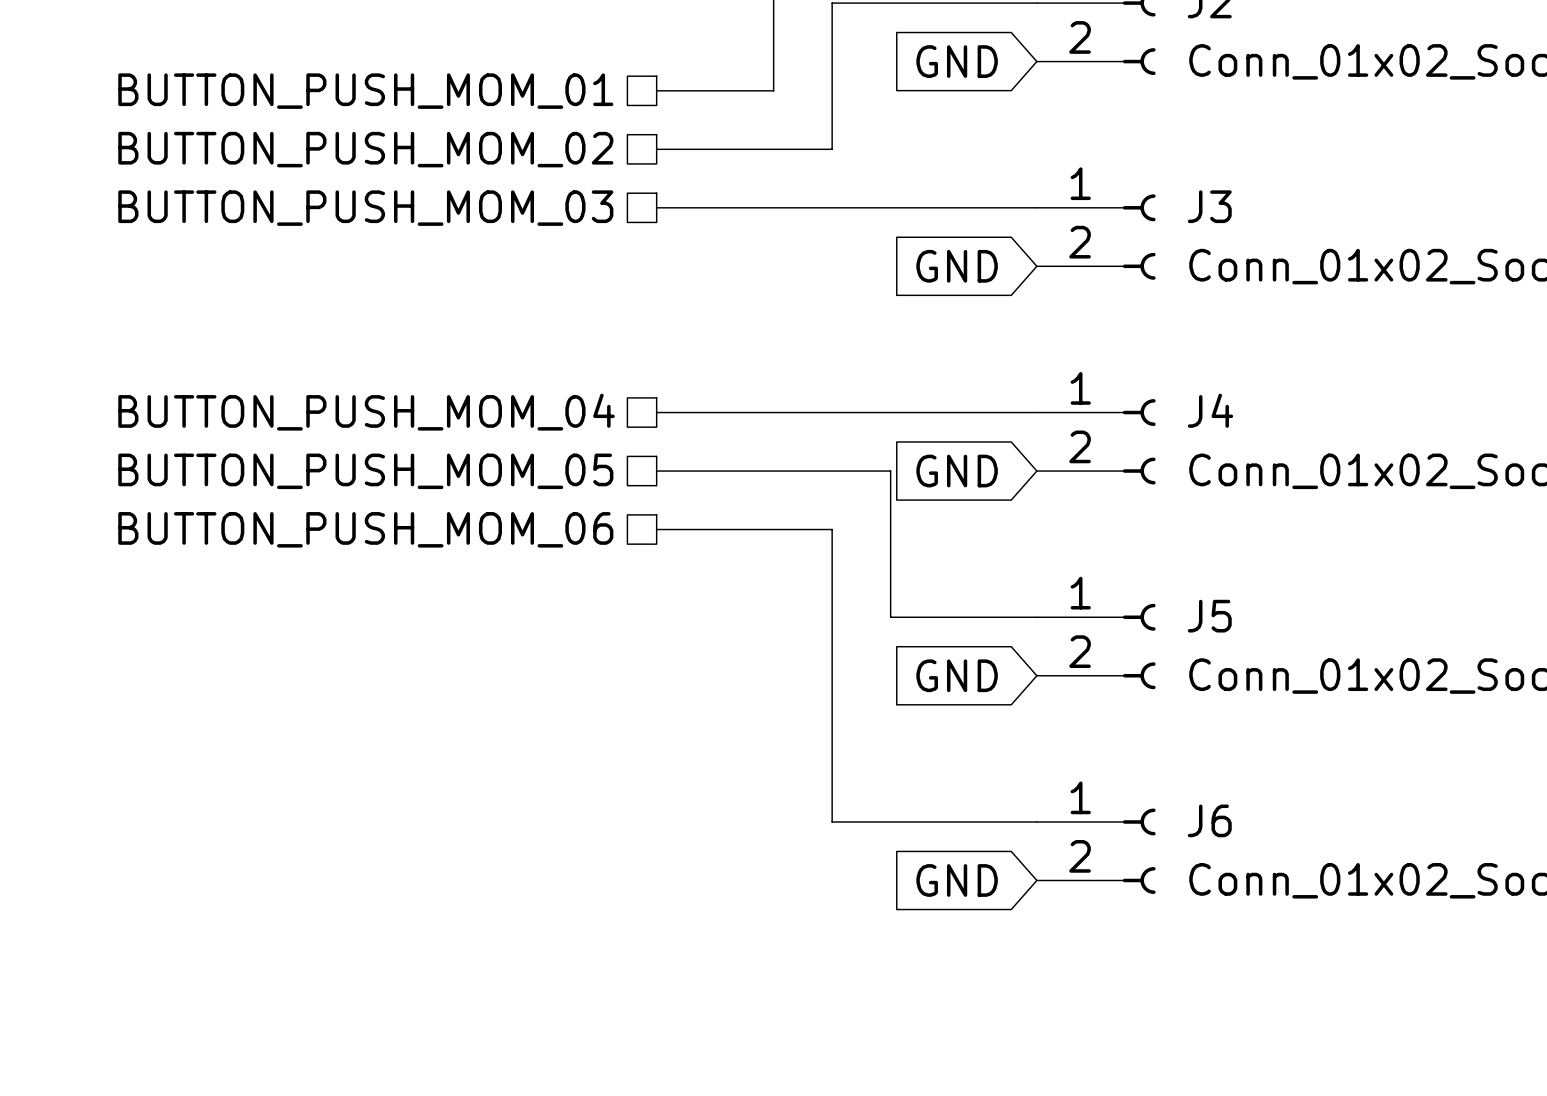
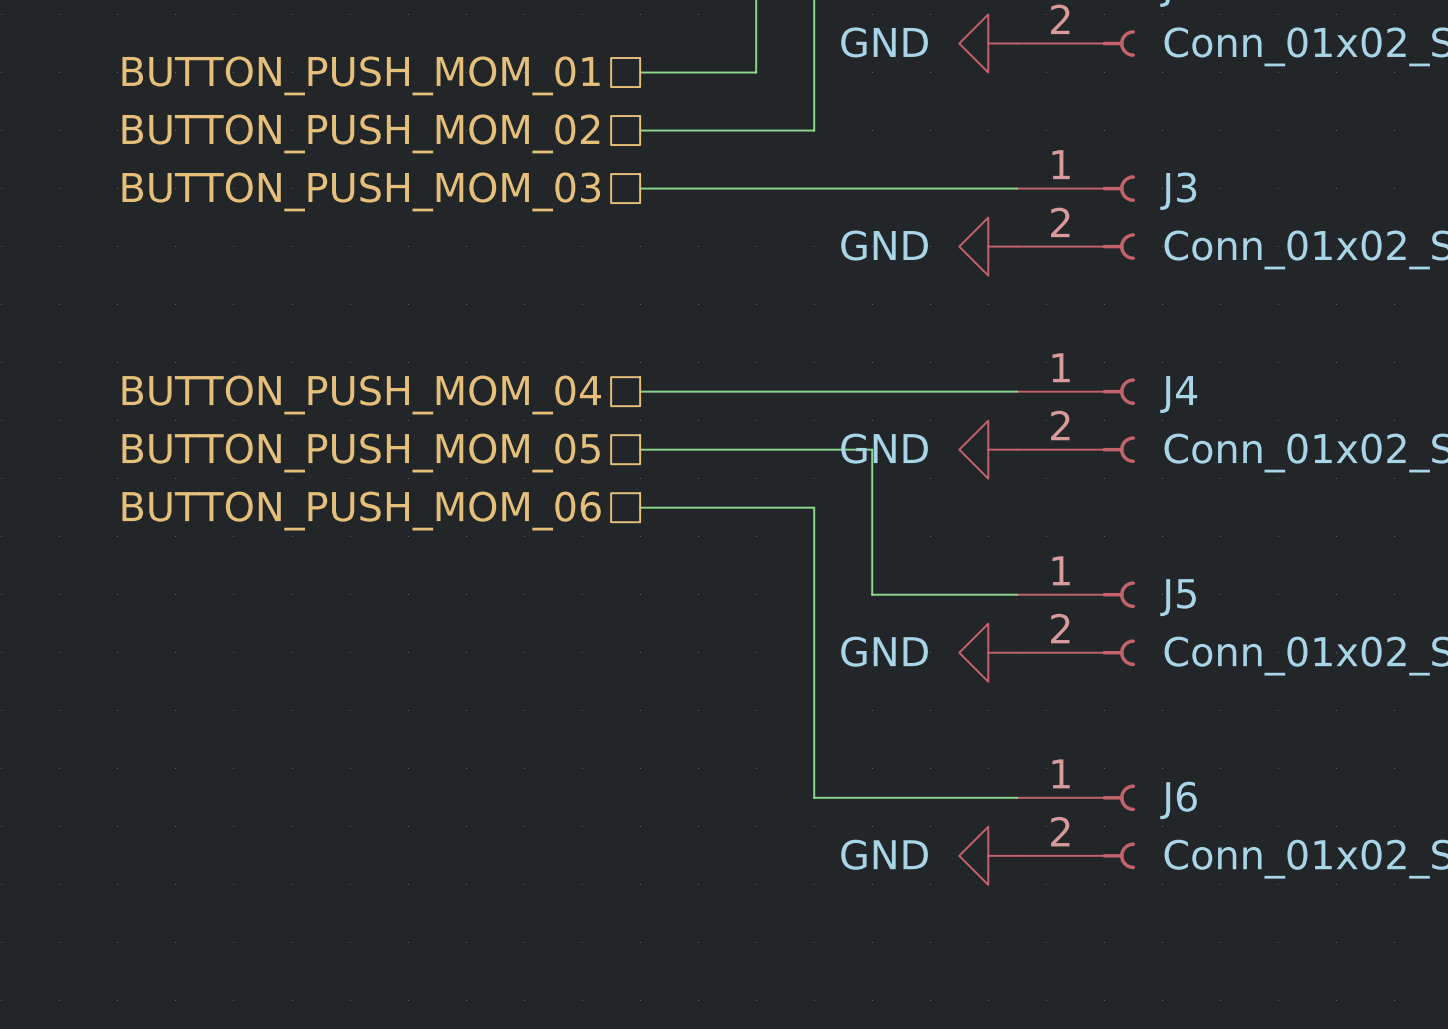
global label: GND (957, 61) -> none
power symbol: none -> GND (988, 43)
global label: GND (957, 266) -> none
power symbol: none -> GND (988, 246)
global label: GND (957, 471) -> none
power symbol: none -> GND (988, 449)
global label: GND (957, 675) -> none
power symbol: none -> GND (988, 652)
global label: GND (957, 880) -> none
power symbol: none -> GND (988, 855)

